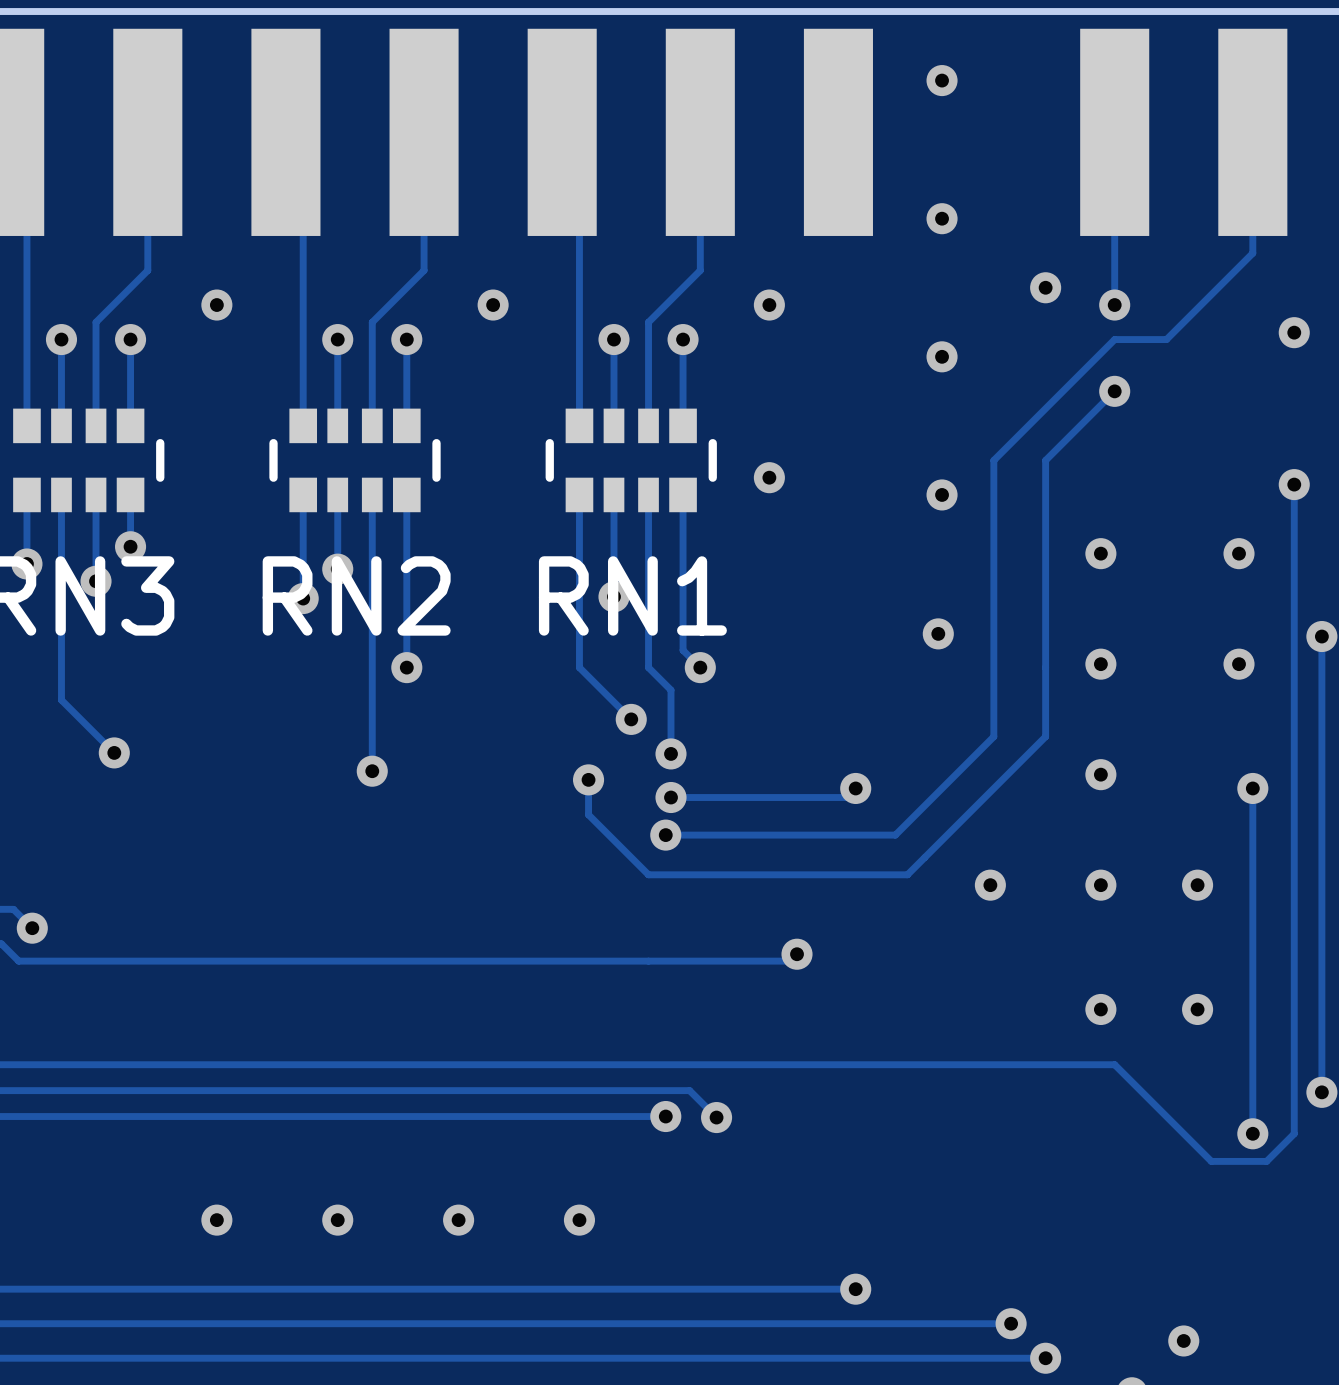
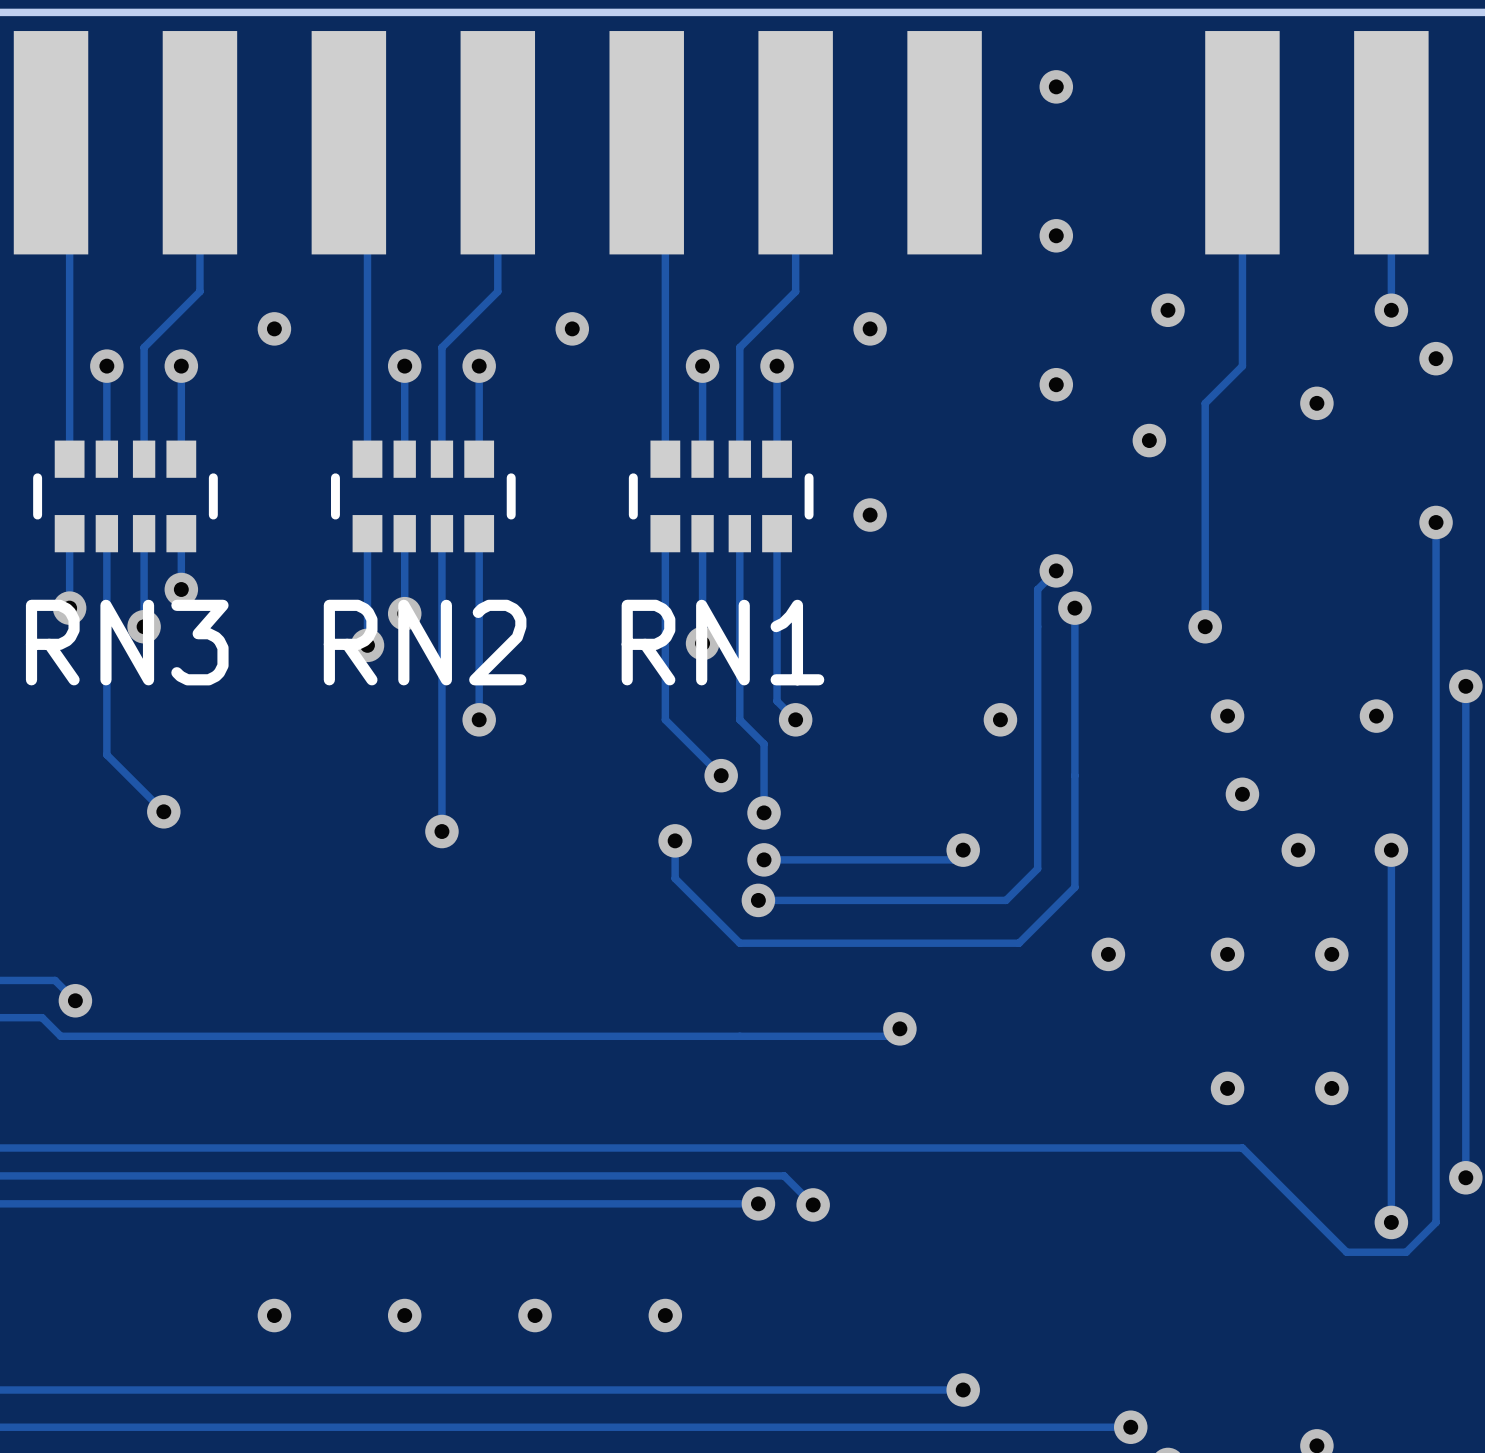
track: (1252, 253) (1166, 339) (1114, 339) -> (1391, 273) (1391, 310)
via: none -> (1391, 310)
track: none -> (1242, 328) (1242, 366)
via: (1114, 305) -> none
track: (1080, 374) (993, 460) (993, 736) (924, 805) -> (1056, 570) (1037, 589) (1037, 868)
track: none -> (1205, 403) (1205, 626)
via: none -> (1316, 403)
track: (1114, 391) (1045, 460) (1045, 736) (959, 823) -> (1074, 608) (1074, 887)
via: (1114, 391) -> none
via: none -> (1149, 440)
via position: (942, 494) -> (1056, 570)
via position: (1100, 553) -> (1205, 626)
via: (1239, 553) -> none
via: none -> (1074, 608)
via: (938, 633) -> none
via: none -> (1000, 719)
via: none -> (1242, 794)
via: (1100, 774) -> none
via: none -> (1298, 850)

